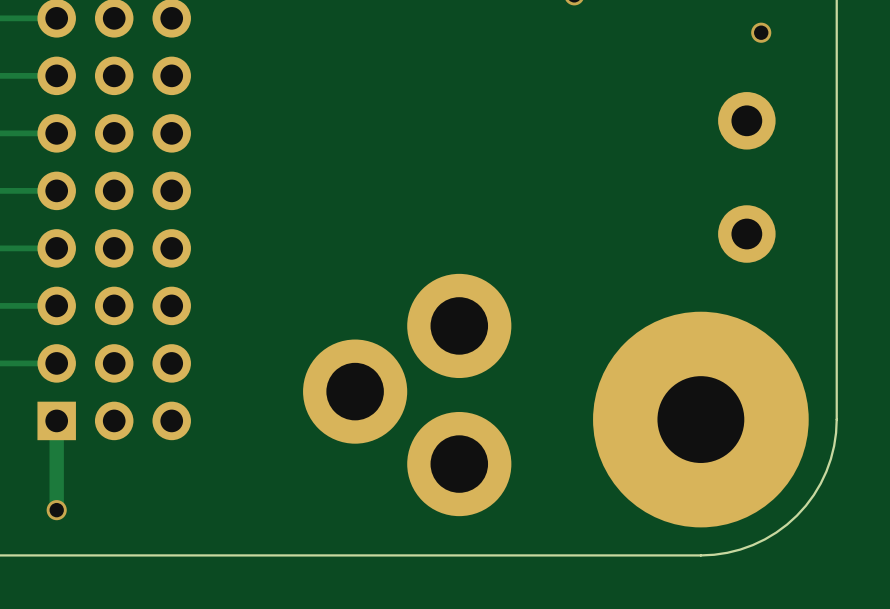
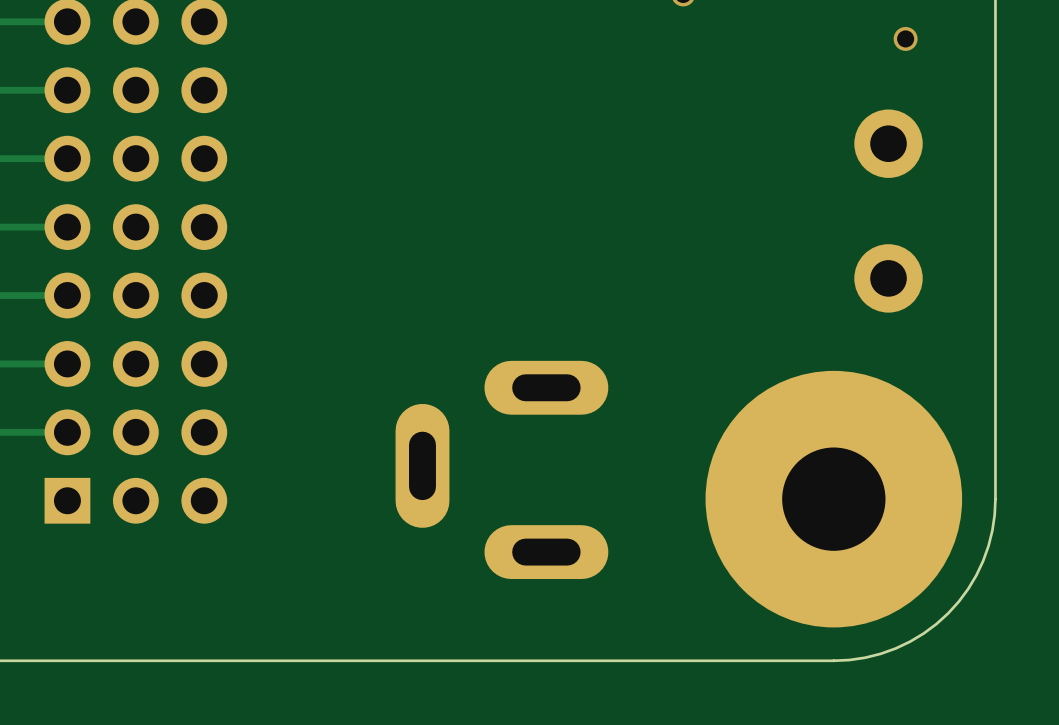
part footprint: [303, 273, 512, 517] -> [395, 360, 609, 580]
track: (56, 420) (56, 510) -> none
via: (56, 510) -> none

